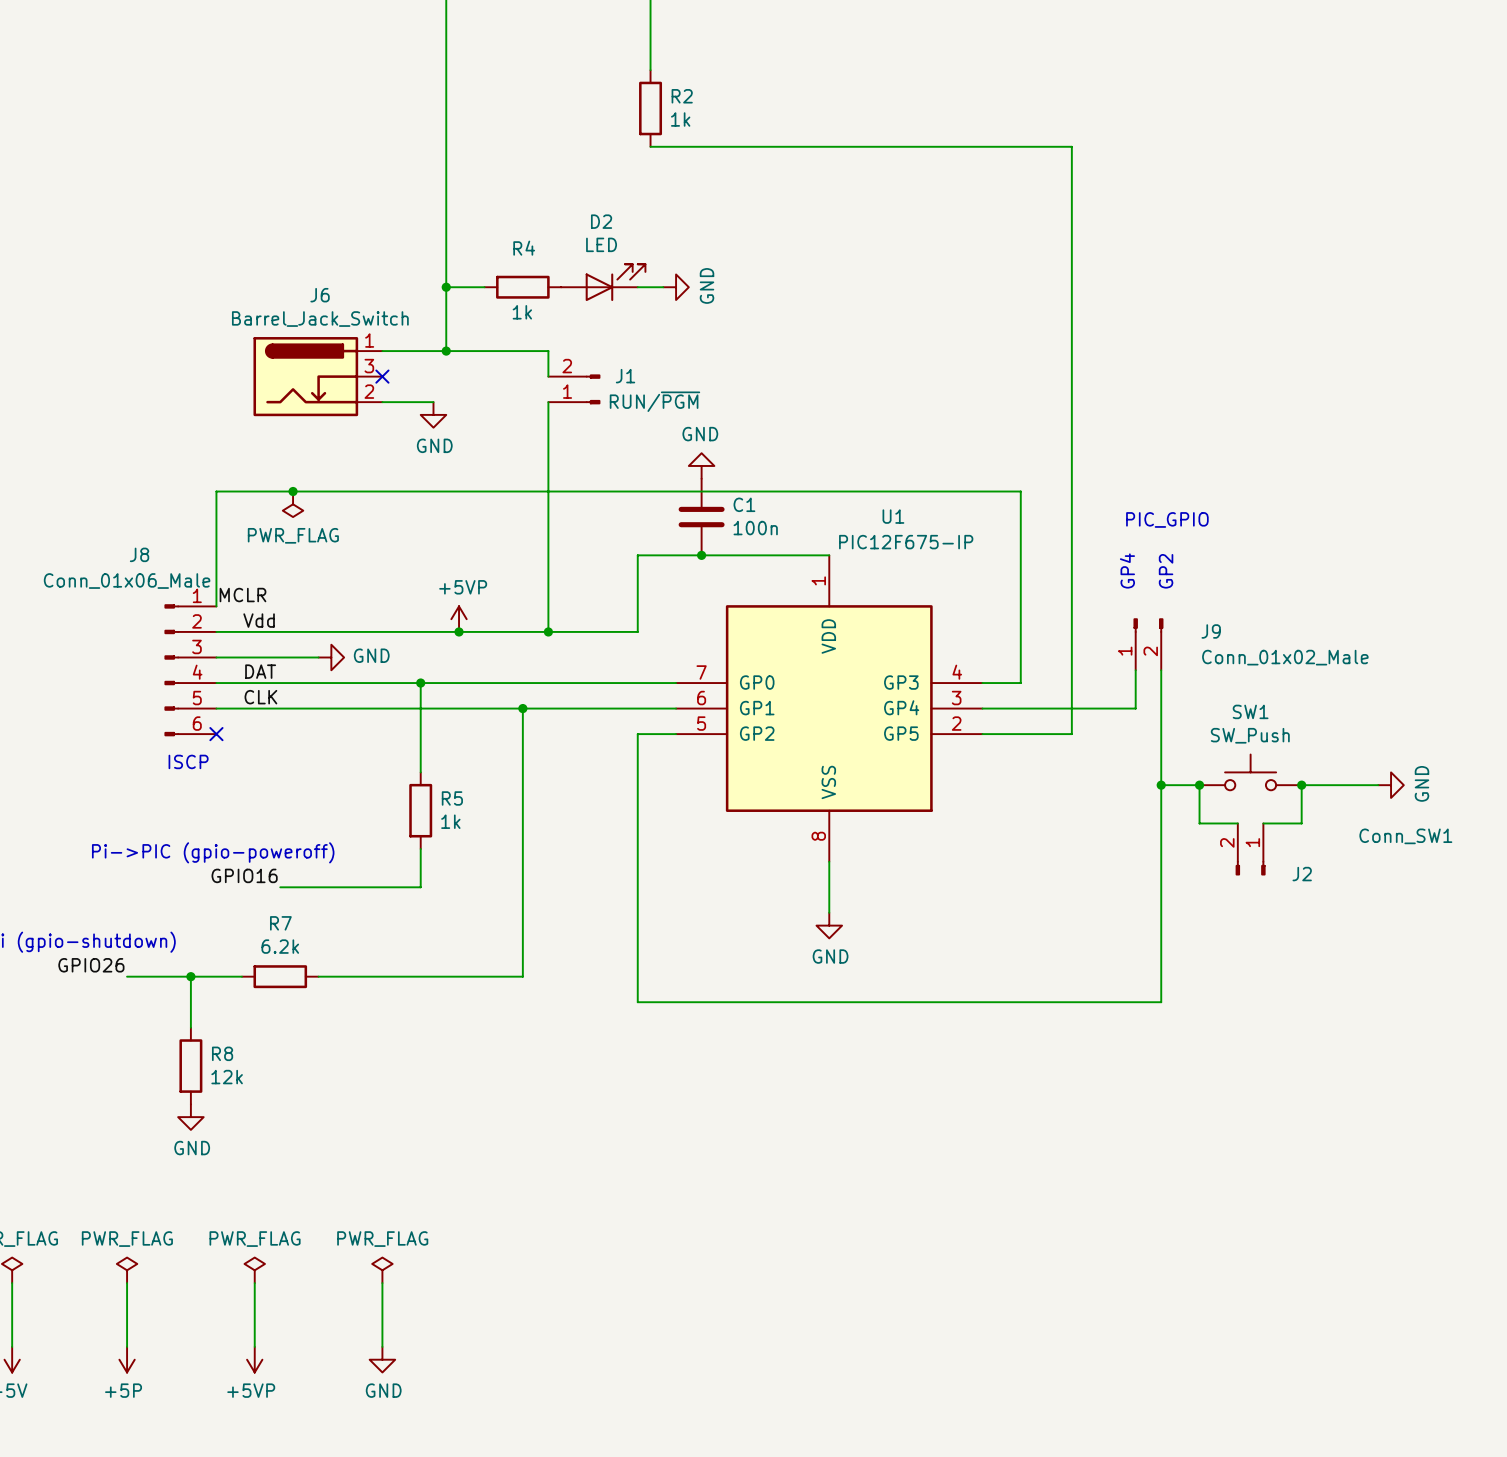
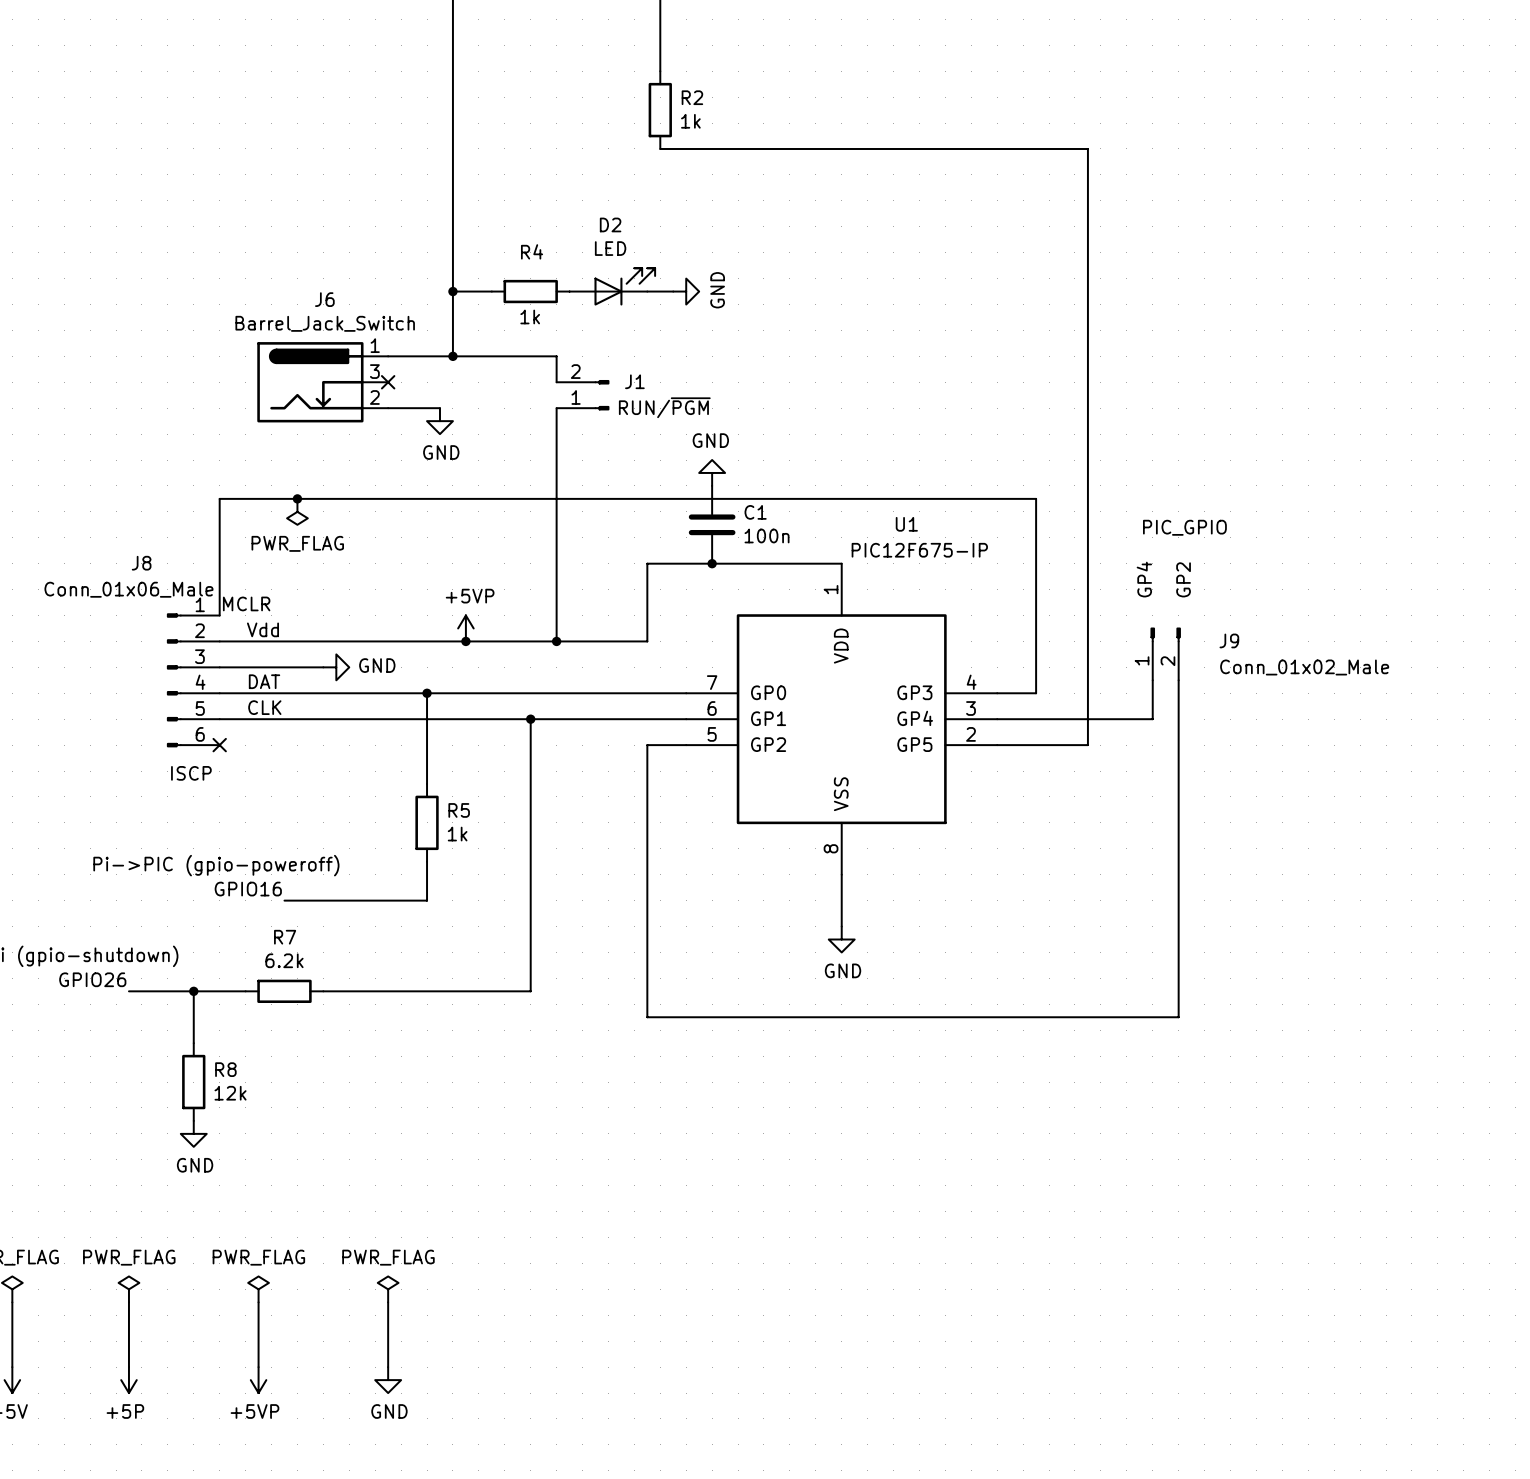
SW1: SW_Push (1250, 772) -> none
wire: (1161, 785) (1199, 785) (1199, 823) (1237, 823) -> none
junction: (1161, 785) -> none
junction: (1199, 785) -> none
junction: (1301, 785) -> none
wire: (1378, 785) (1301, 785) (1301, 823) (1263, 823) -> none
power symbol: GND (1391, 785) -> none
J2: Conn_SW1 (1250, 849) -> none

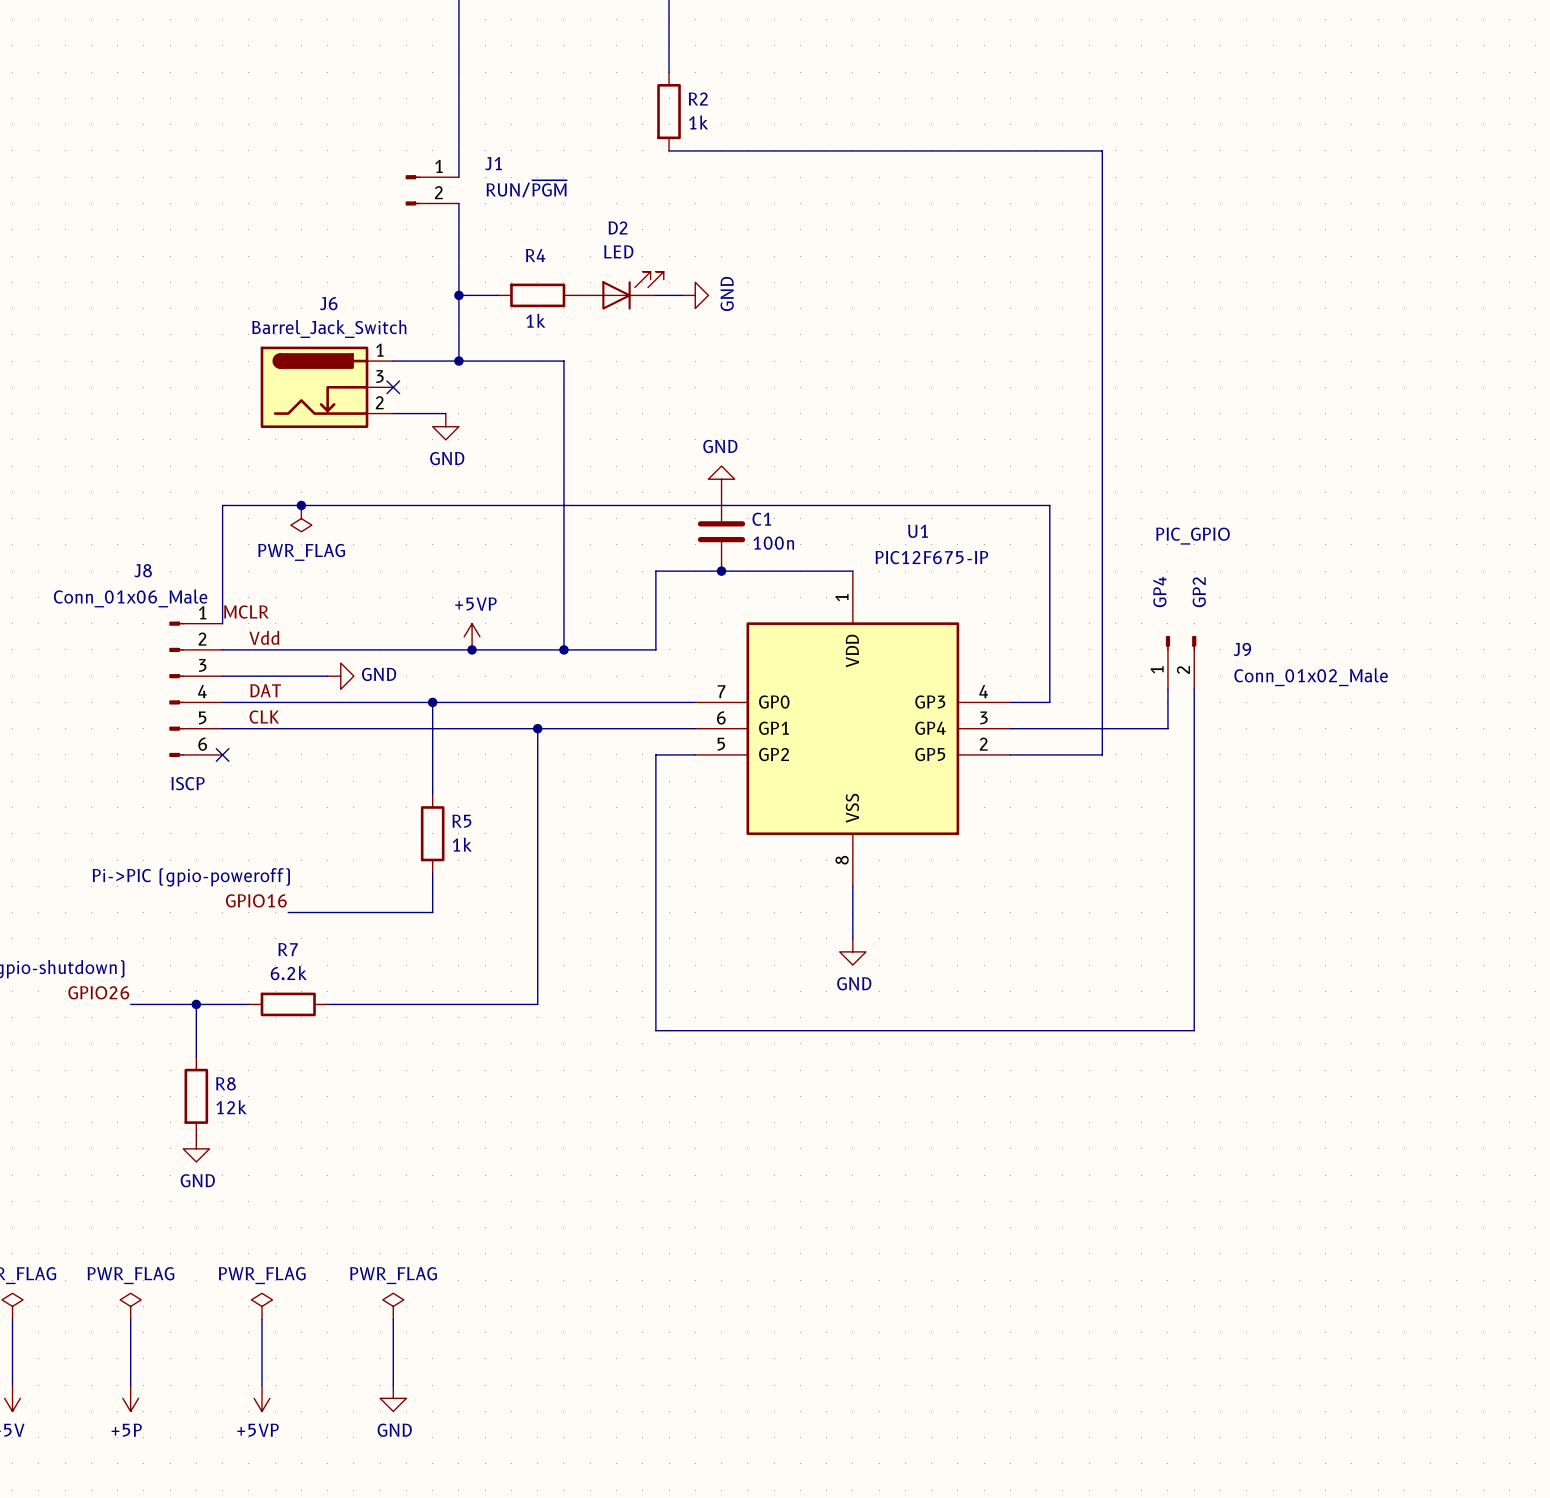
wire: (452, 174) (452, 200) -> (563, 387) (563, 413)
J1 name position: J1 (634, 381) -> J1 (493, 163)
J1 position: (582, 395) -> (432, 190)
J1 rotation: 0° (601, 395) -> 180° (412, 190)
J1 value position: RUN/~{PGM} (664, 407) -> RUN/~{PGM} (526, 188)

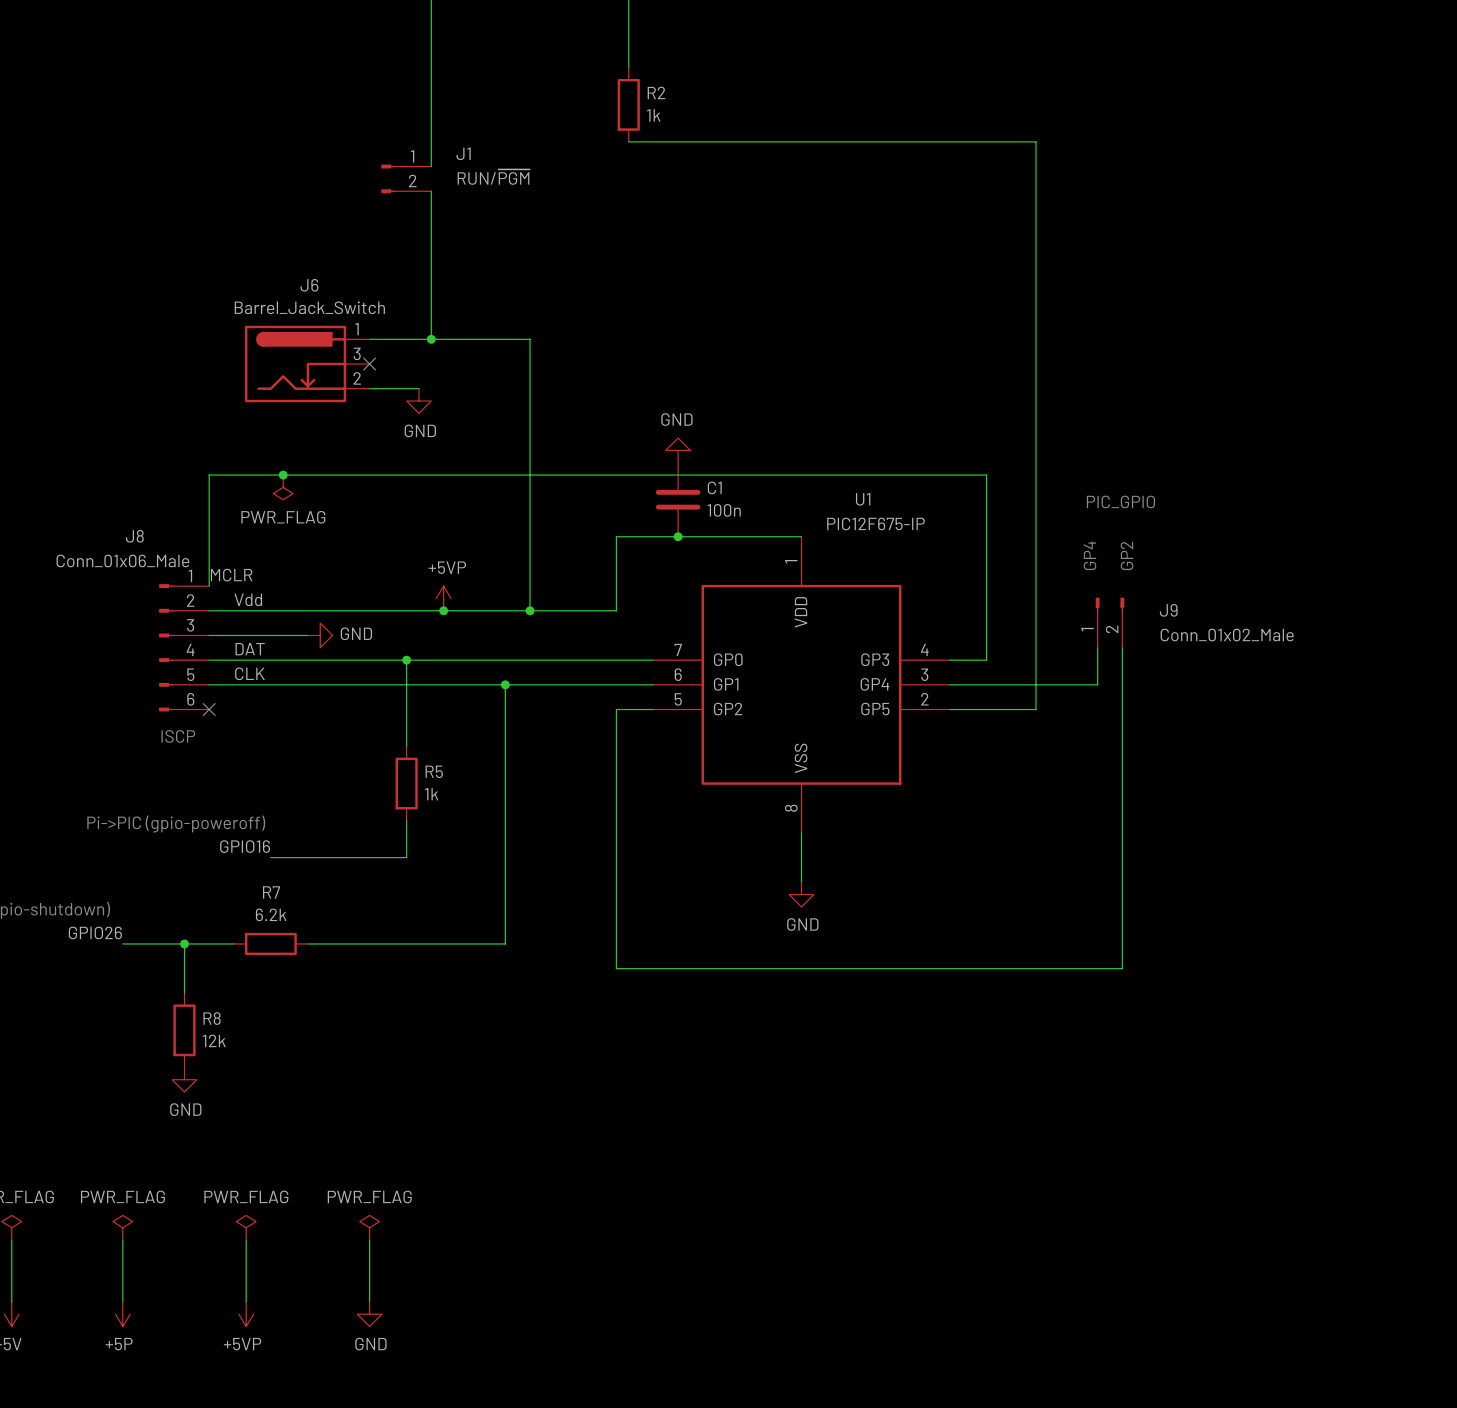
D2: LED (620, 290) -> none
wire: (458, 295) (498, 295) -> none
junction: (458, 295) -> none
R4: 1k (537, 295) -> none
wire: (655, 295) (682, 295) -> none
power symbol: GND (695, 295) -> none

